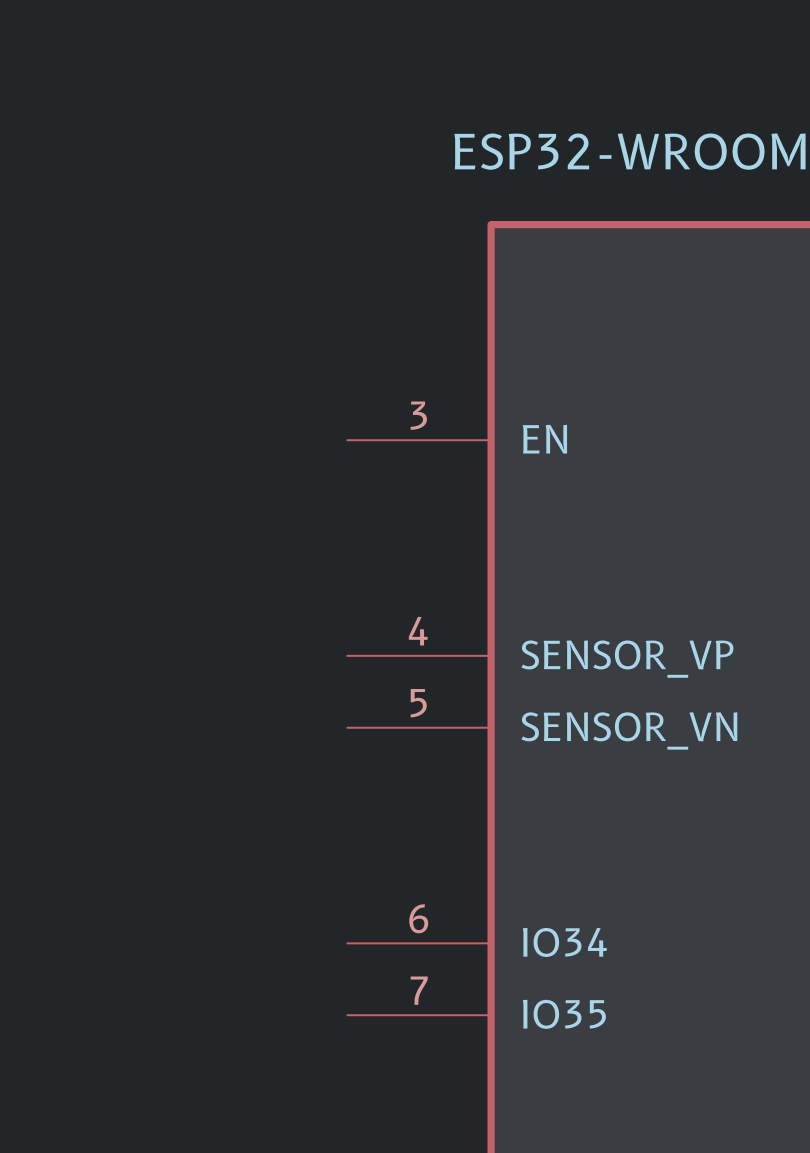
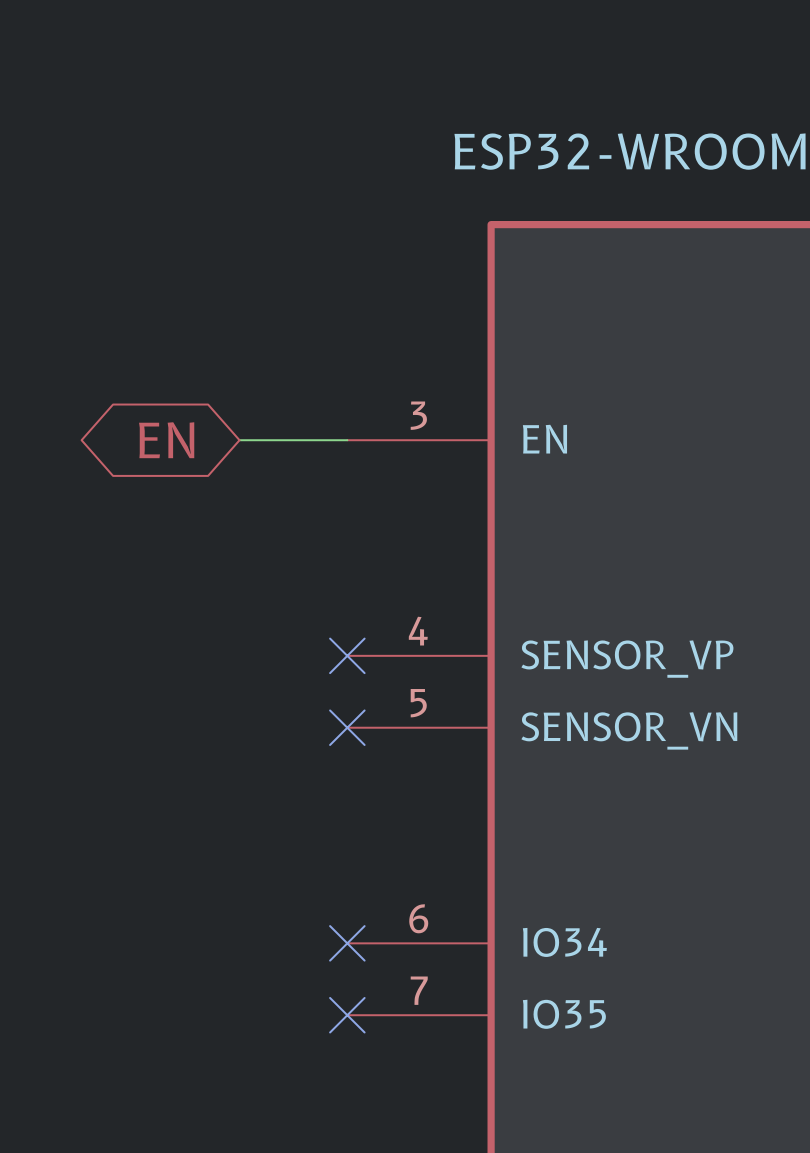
global label: none -> EN (166, 440)
wire: none -> (239, 440) (347, 440)
no-connect mark: none -> (347, 655)
no-connect mark: none -> (347, 727)
no-connect mark: none -> (347, 943)
no-connect mark: none -> (347, 1015)

